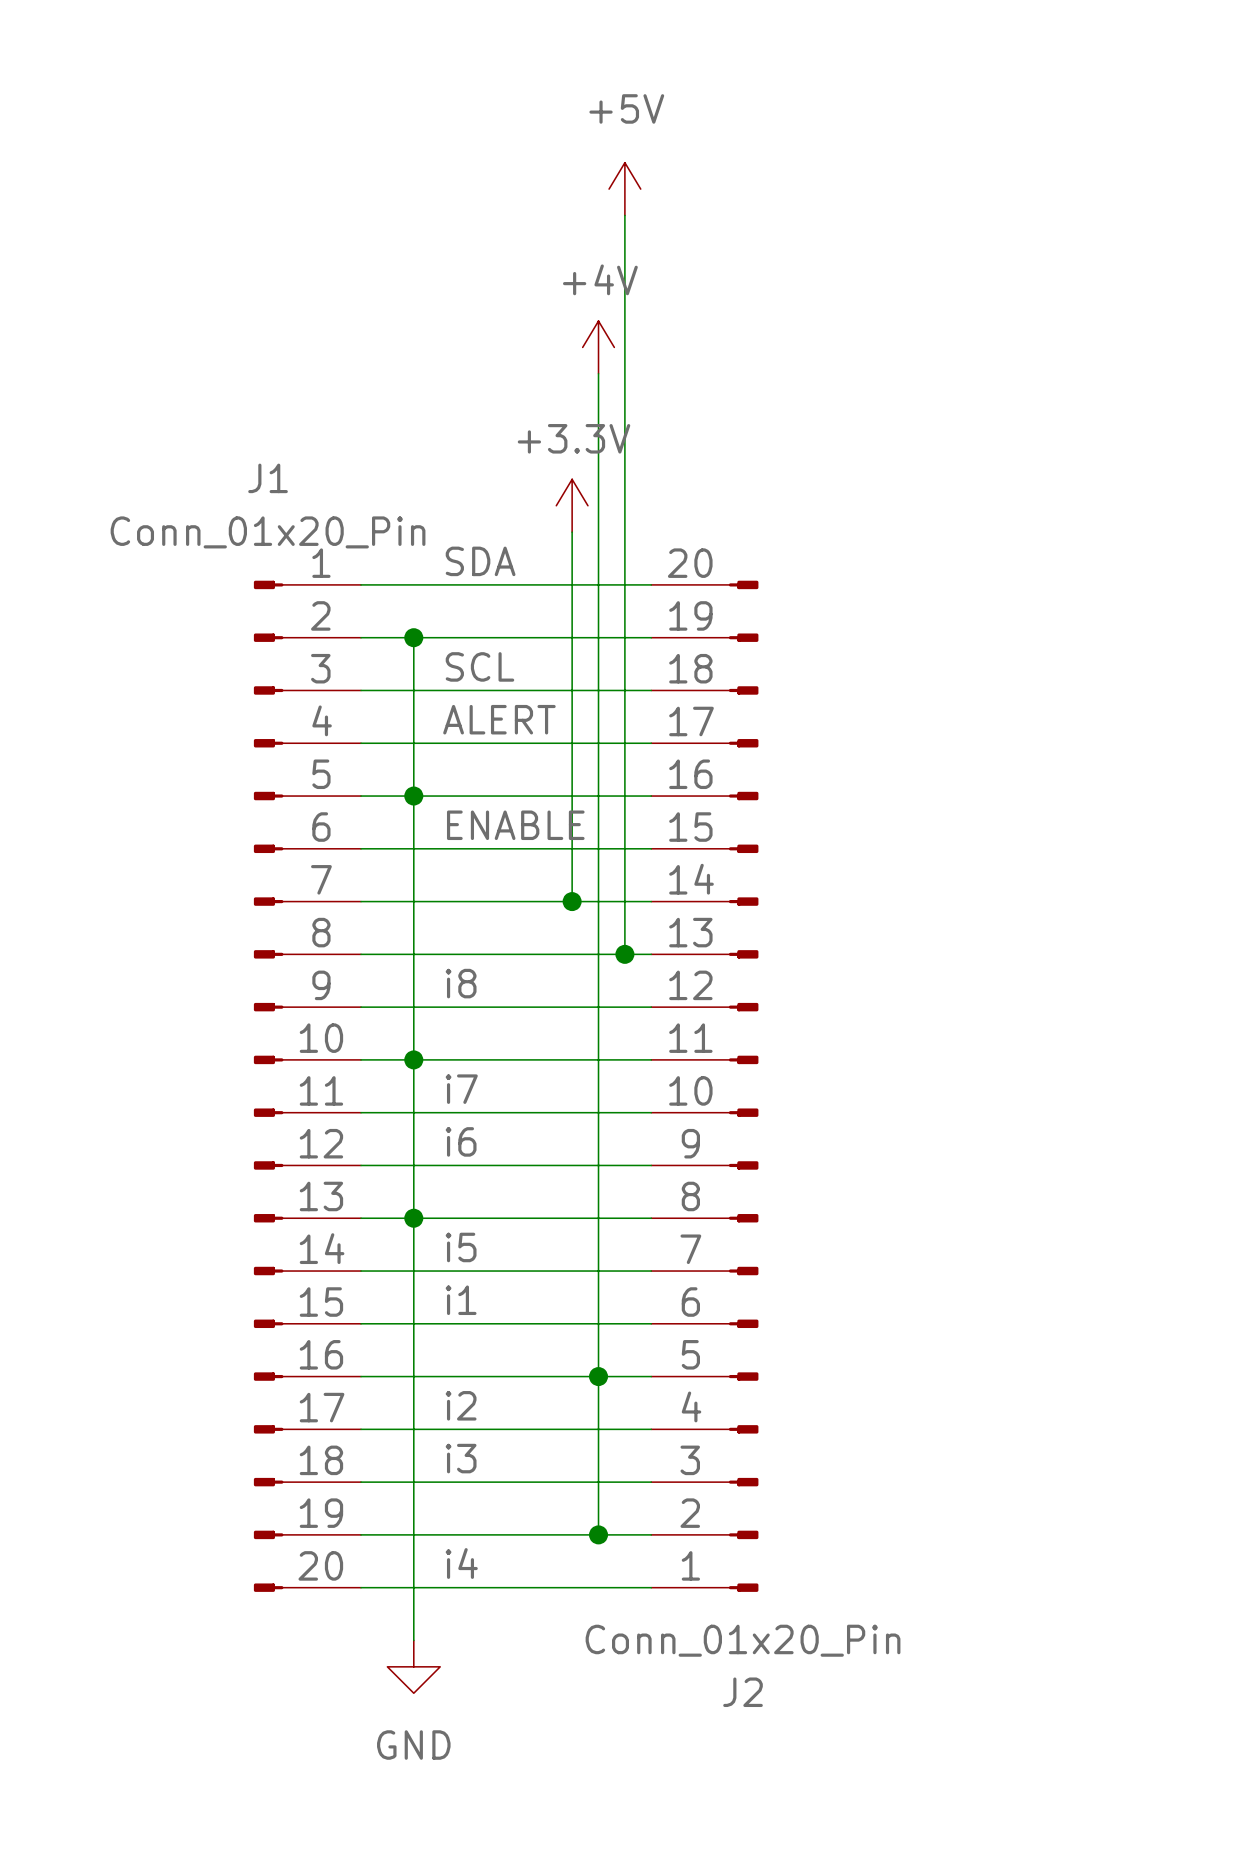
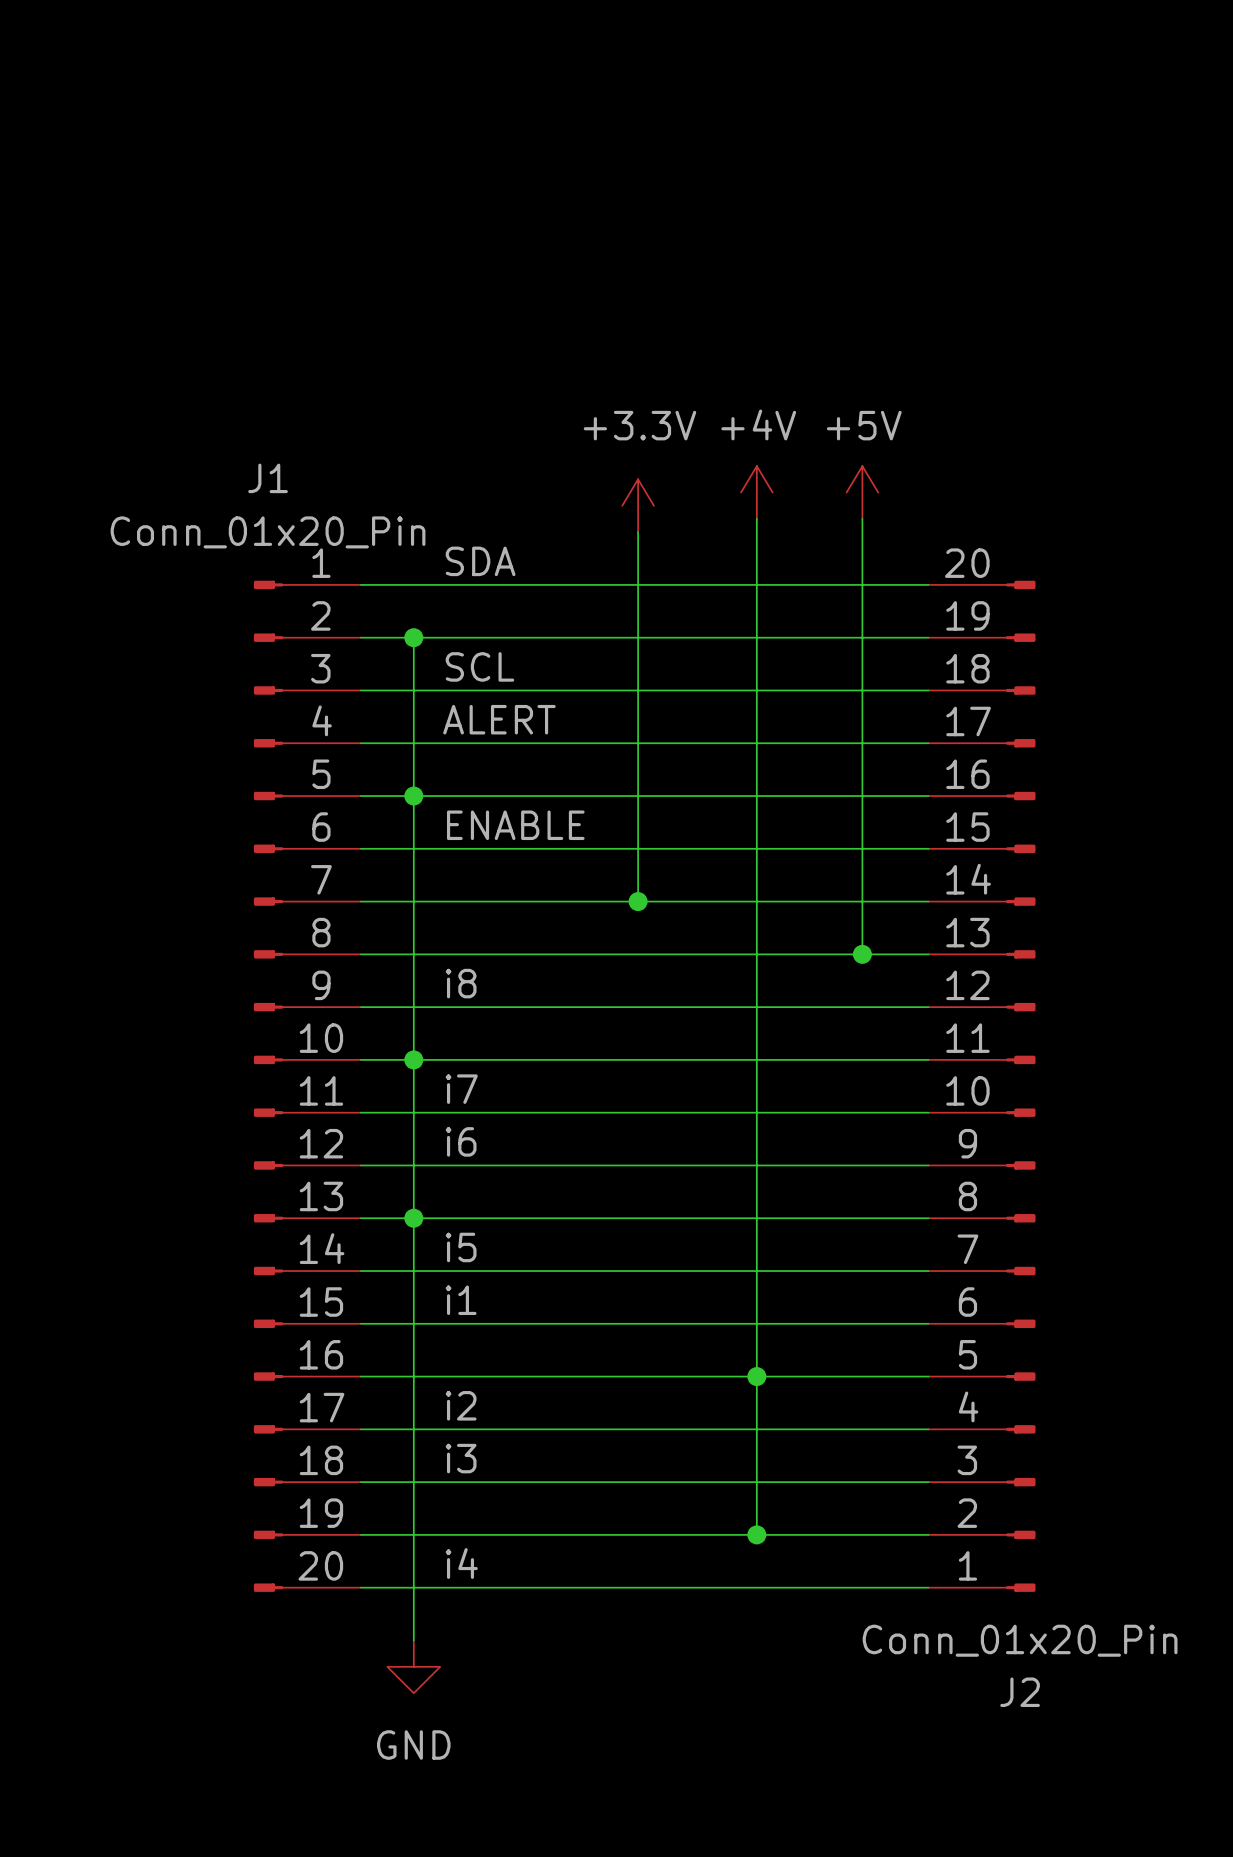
power symbol text position: +5V (626, 108) -> +5V (864, 425)
power symbol position: +5V (624, 189) -> +5V (862, 492)
wire: (624, 215) (624, 954) -> none
power symbol position: +4V (598, 347) -> +4V (756, 492)
wire: (598, 373) (598, 1534) -> none
power symbol text position: +3.3V (574, 438) -> +3.3V (639, 425)
power symbol position: +3.3V (572, 505) -> +3.3V (638, 505)
wire: none -> (756, 518) (756, 1534)
wire: none -> (862, 518) (862, 954)
wire: (572, 532) (572, 901) -> (638, 532) (638, 901)
wire: none -> (651, 584) (928, 584)
wire: none -> (651, 637) (928, 637)
wire: none -> (651, 690) (928, 690)
wire: none -> (651, 743) (928, 743)
wire: none -> (651, 796) (928, 796)
wire: none -> (651, 848) (928, 848)
junction: (572, 901) -> none
junction: none -> (638, 901)
wire: none -> (651, 901) (928, 901)
junction: (624, 954) -> none
wire: none -> (651, 954) (928, 954)
junction: none -> (862, 954)
wire: none -> (651, 1007) (928, 1007)
wire: none -> (651, 1059) (928, 1059)
J2 position: (704, 1086) -> (981, 1086)
wire: none -> (651, 1112) (928, 1112)
wire: none -> (651, 1165) (928, 1165)
wire: none -> (651, 1218) (928, 1218)
wire: none -> (651, 1271) (928, 1271)
wire: none -> (651, 1323) (928, 1323)
junction: (598, 1376) -> none
wire: none -> (651, 1376) (928, 1376)
junction: none -> (756, 1376)
wire: none -> (651, 1429) (928, 1429)
wire: none -> (651, 1482) (928, 1482)
junction: (598, 1534) -> none
wire: none -> (651, 1534) (928, 1534)
junction: none -> (756, 1534)
wire: none -> (651, 1587) (928, 1587)

